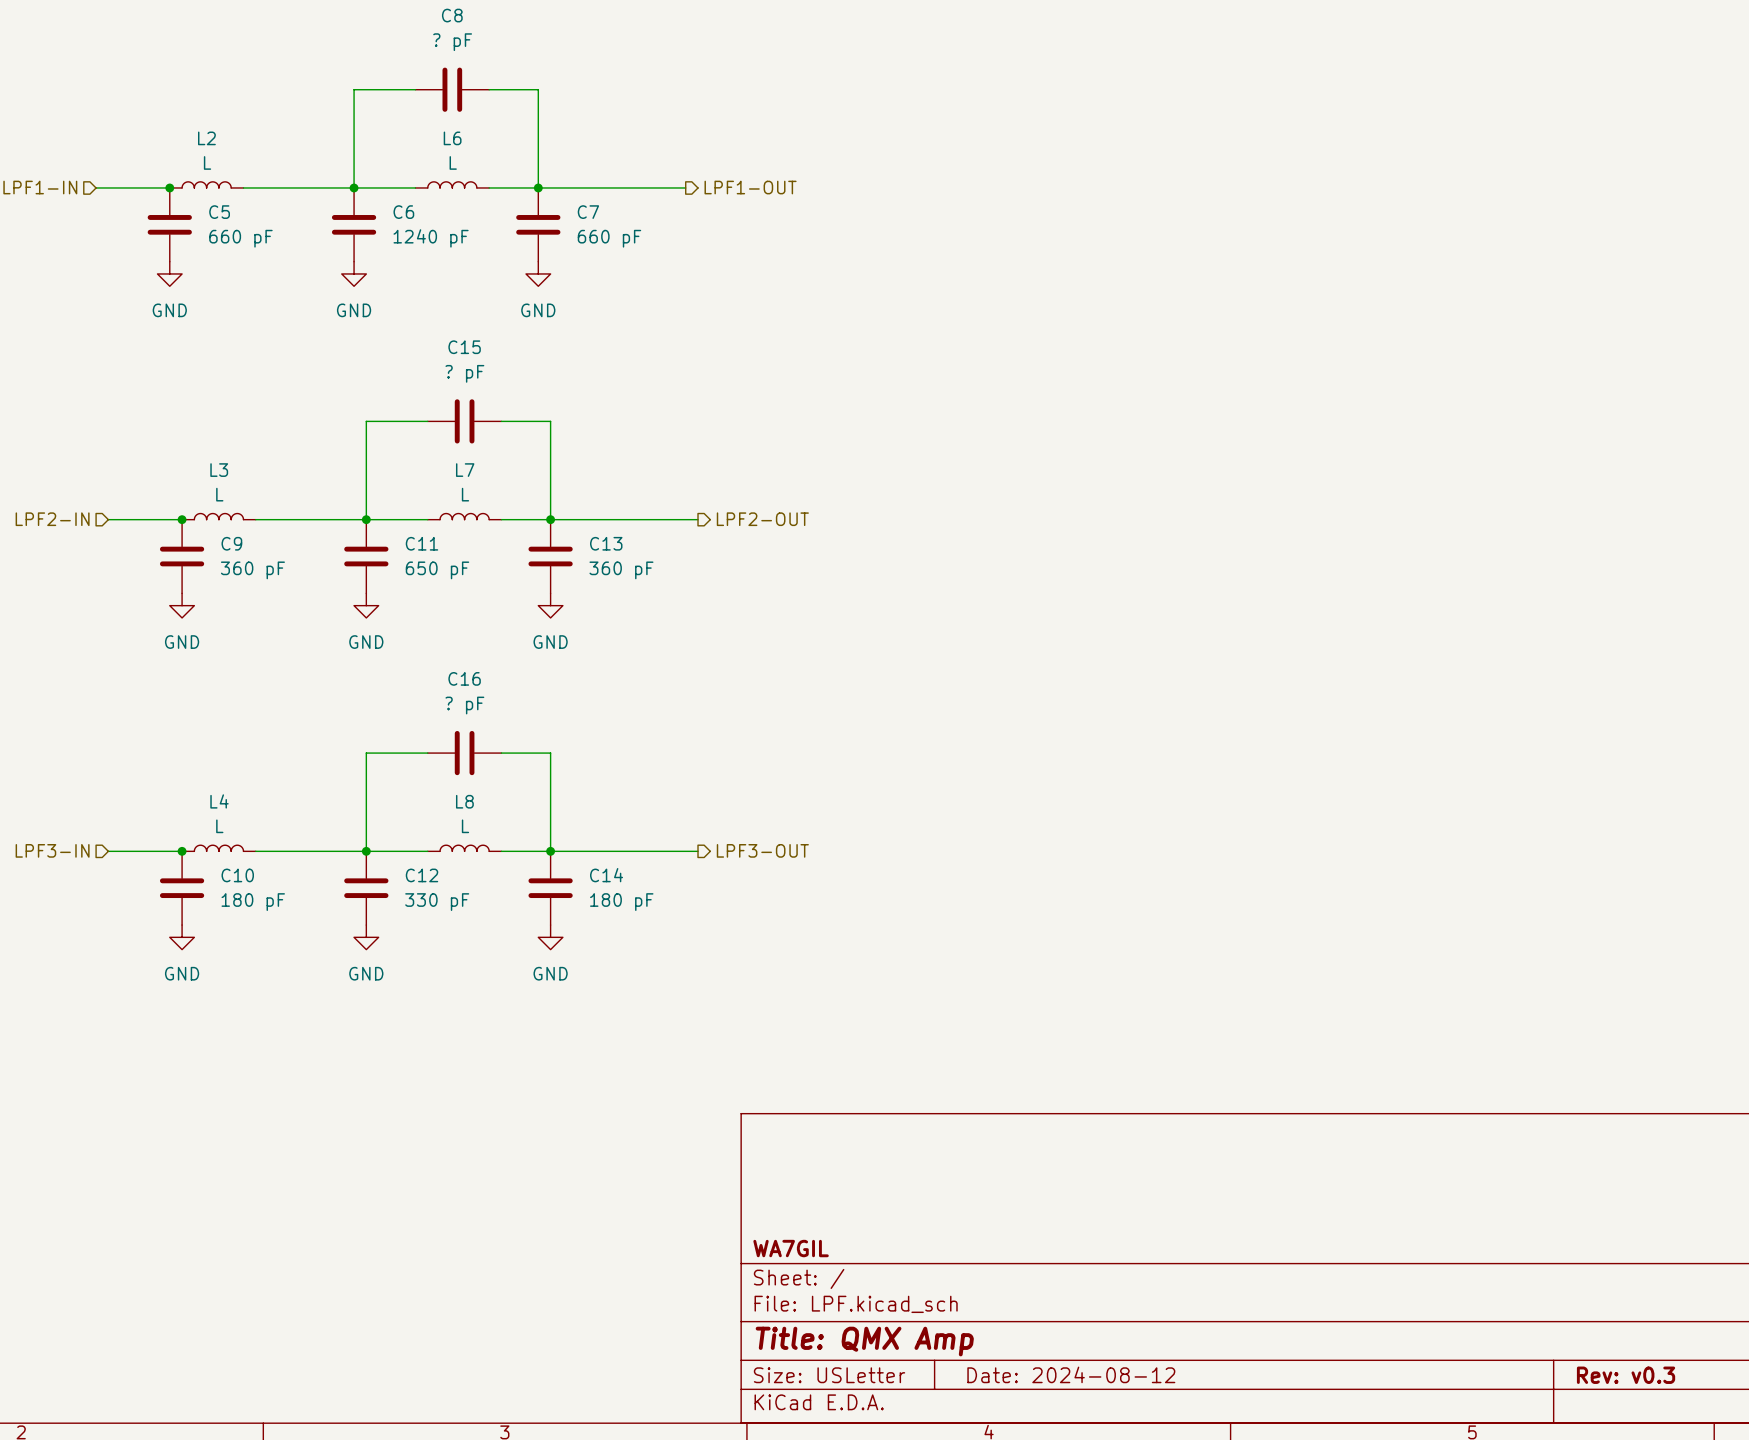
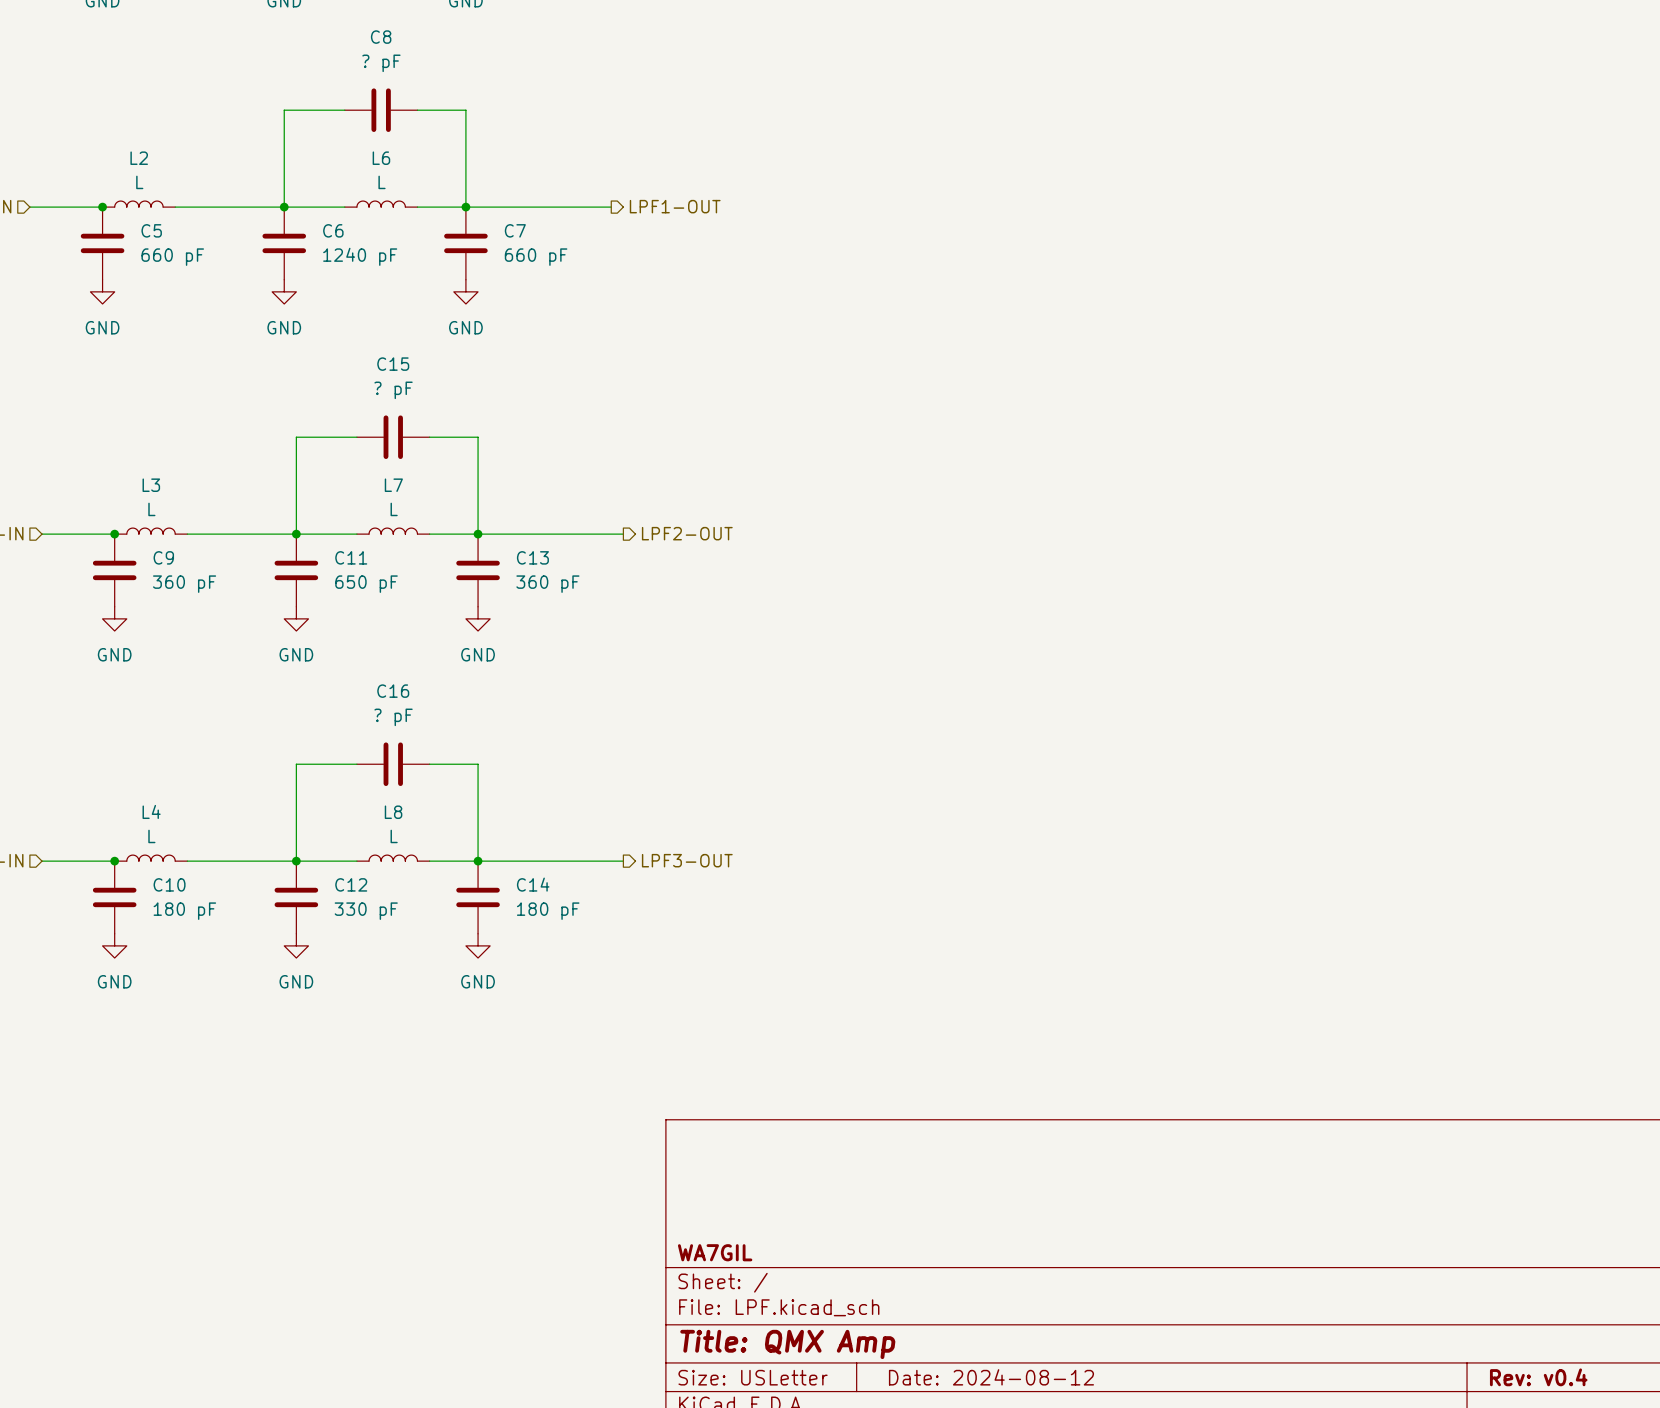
title block: Rev: v0.3 (1626, 1375) -> Rev: v0.4 (1538, 1377)

